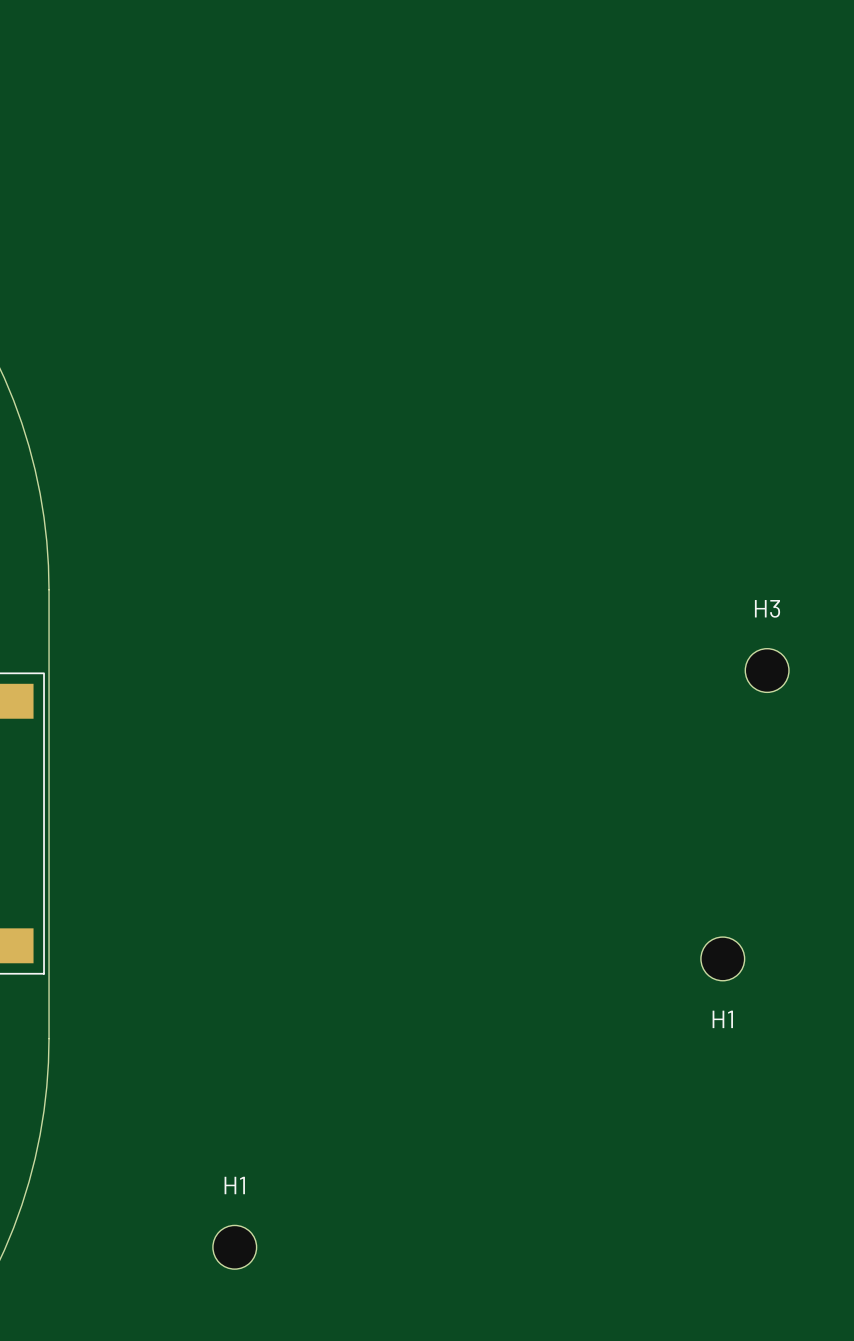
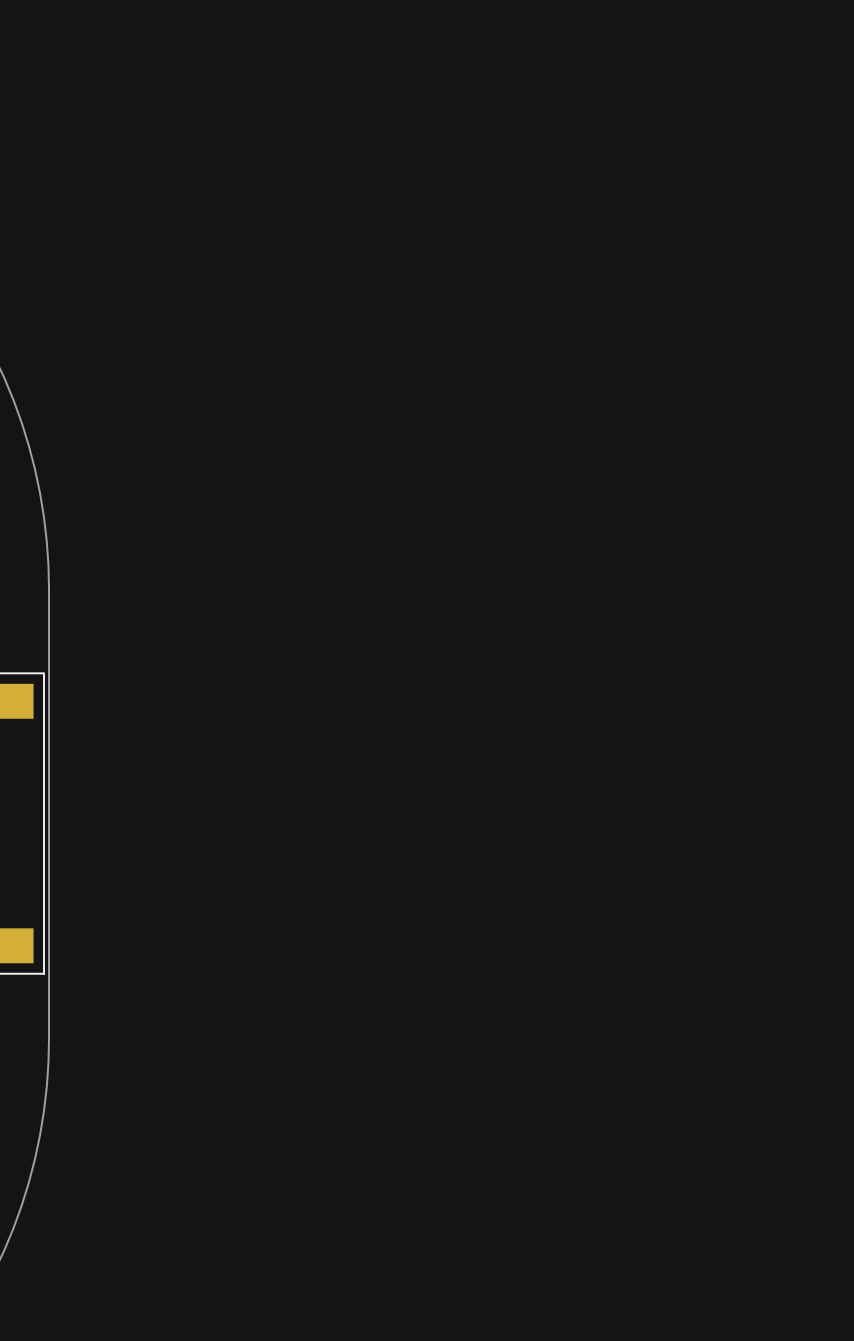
H3: (767, 670) -> none
H1: (722, 958) -> none
H1: (234, 1247) -> none

